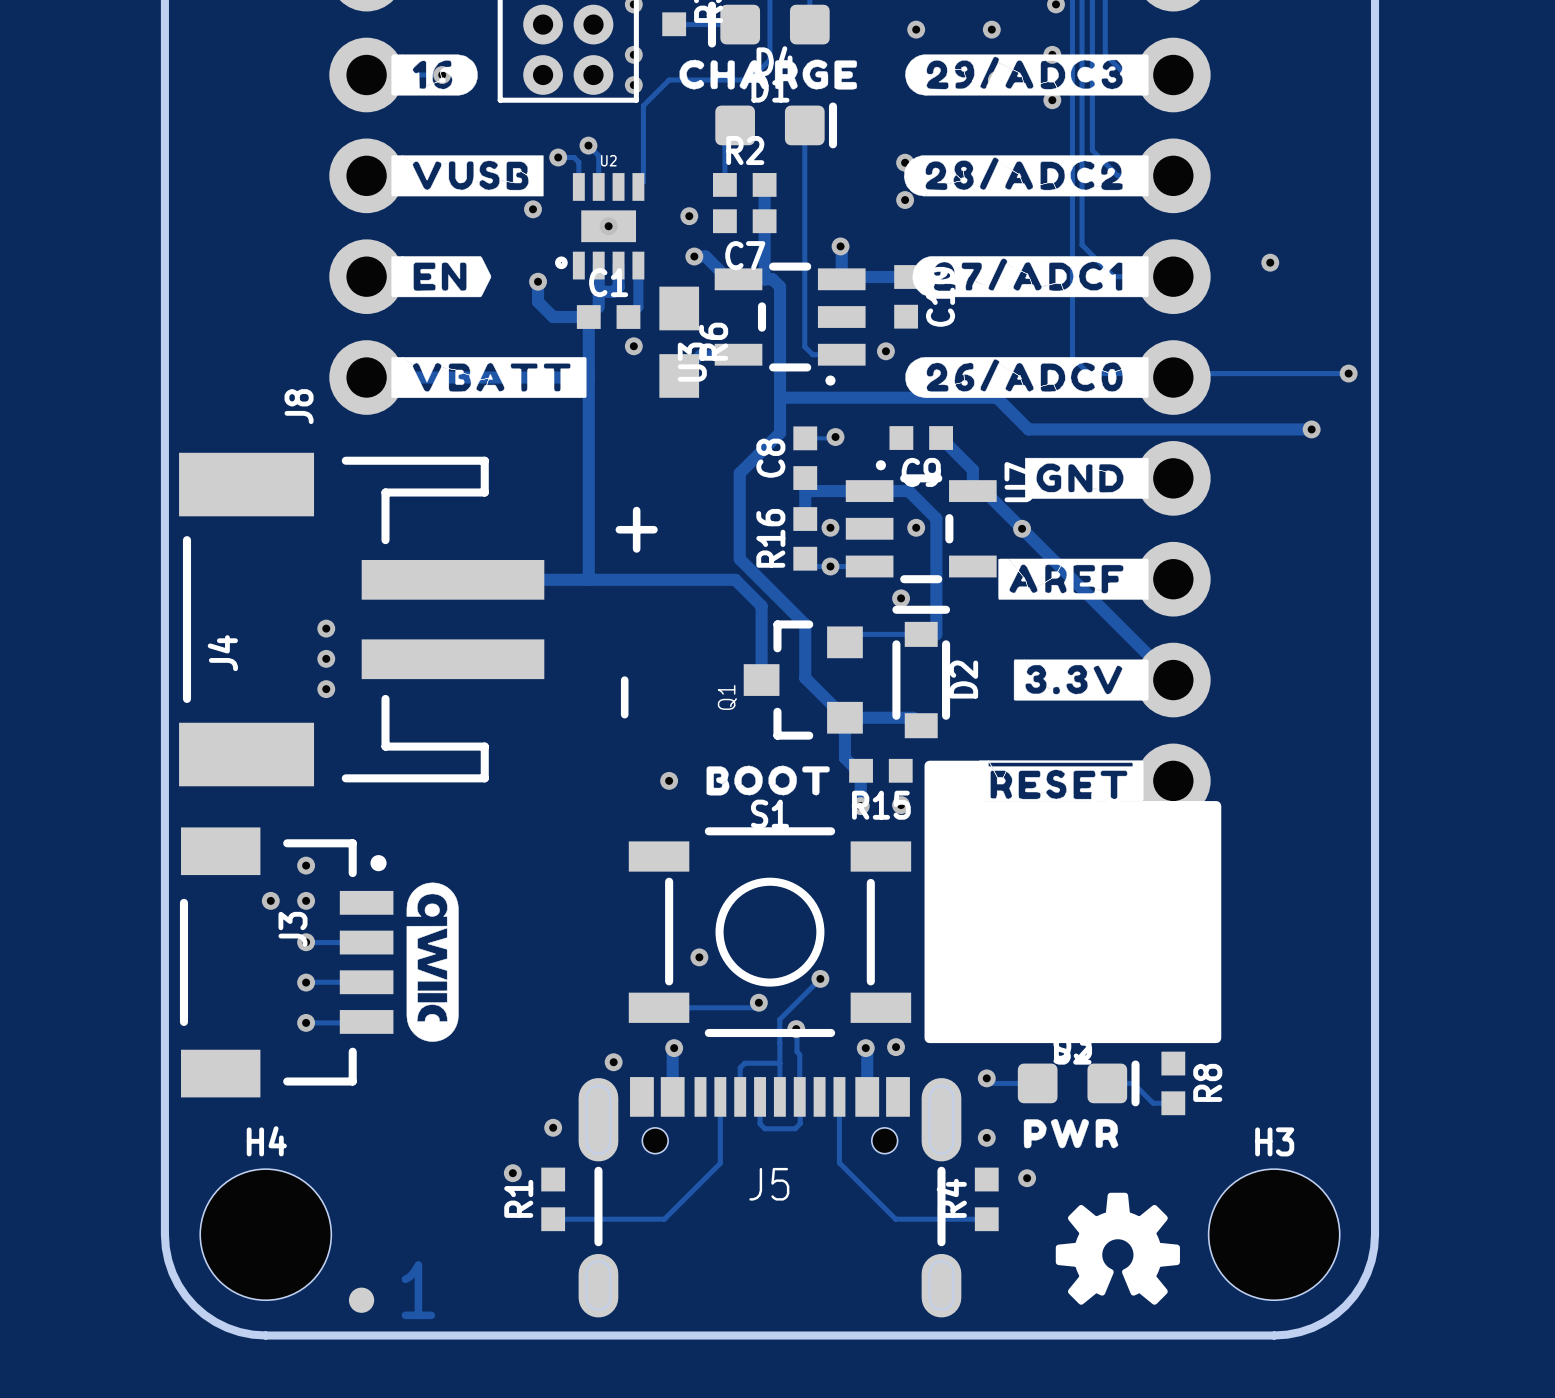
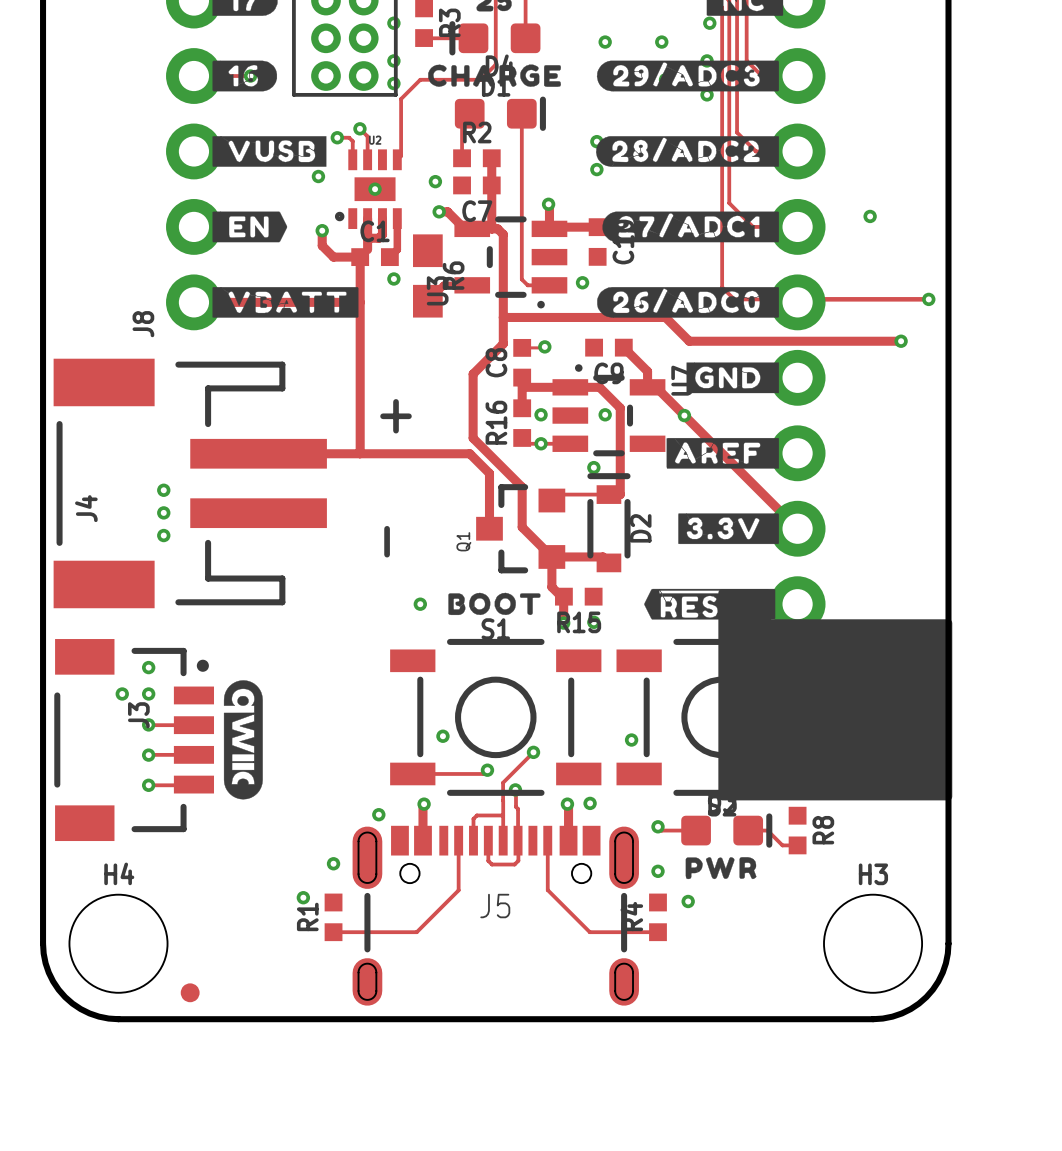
drawing: [924, 760, 1222, 1044] -> none
drawing: none -> [718, 589, 953, 801]
drawing: [1055, 1192, 1180, 1305] -> none
text: 1 (418, 1290) -> none

